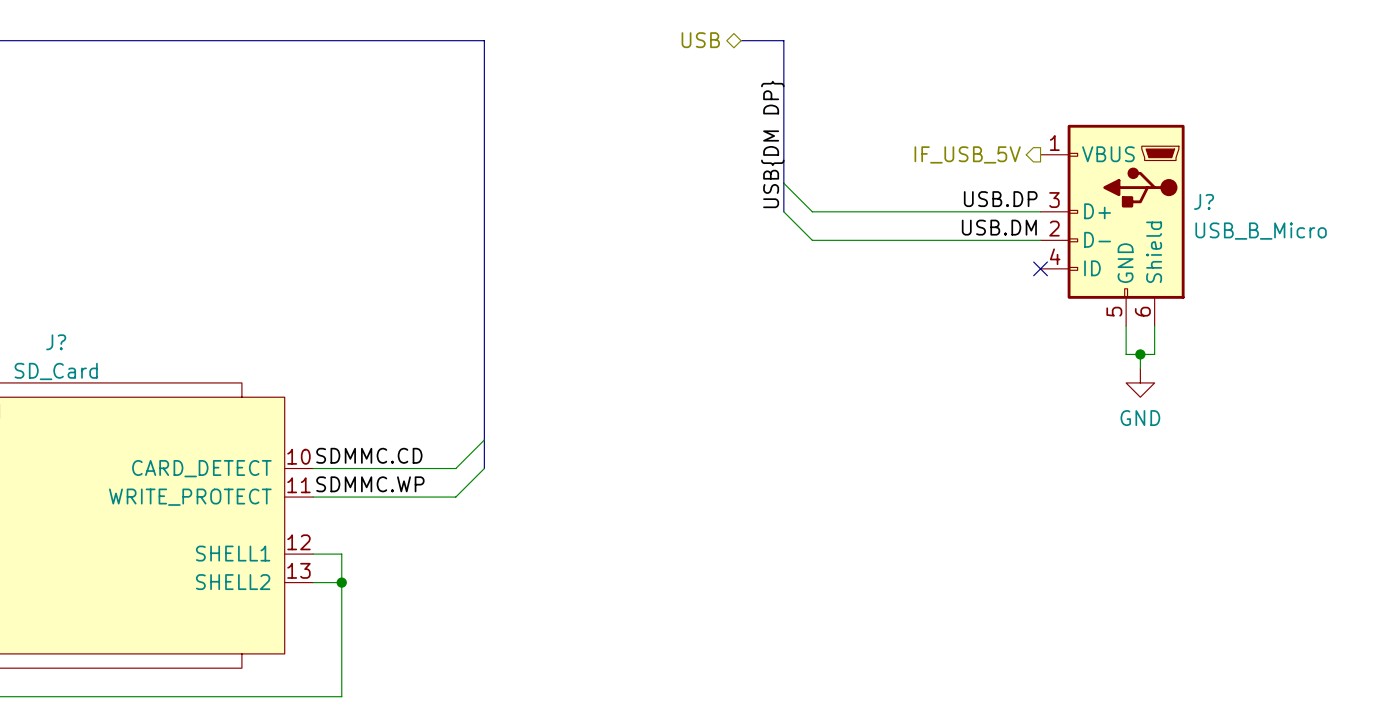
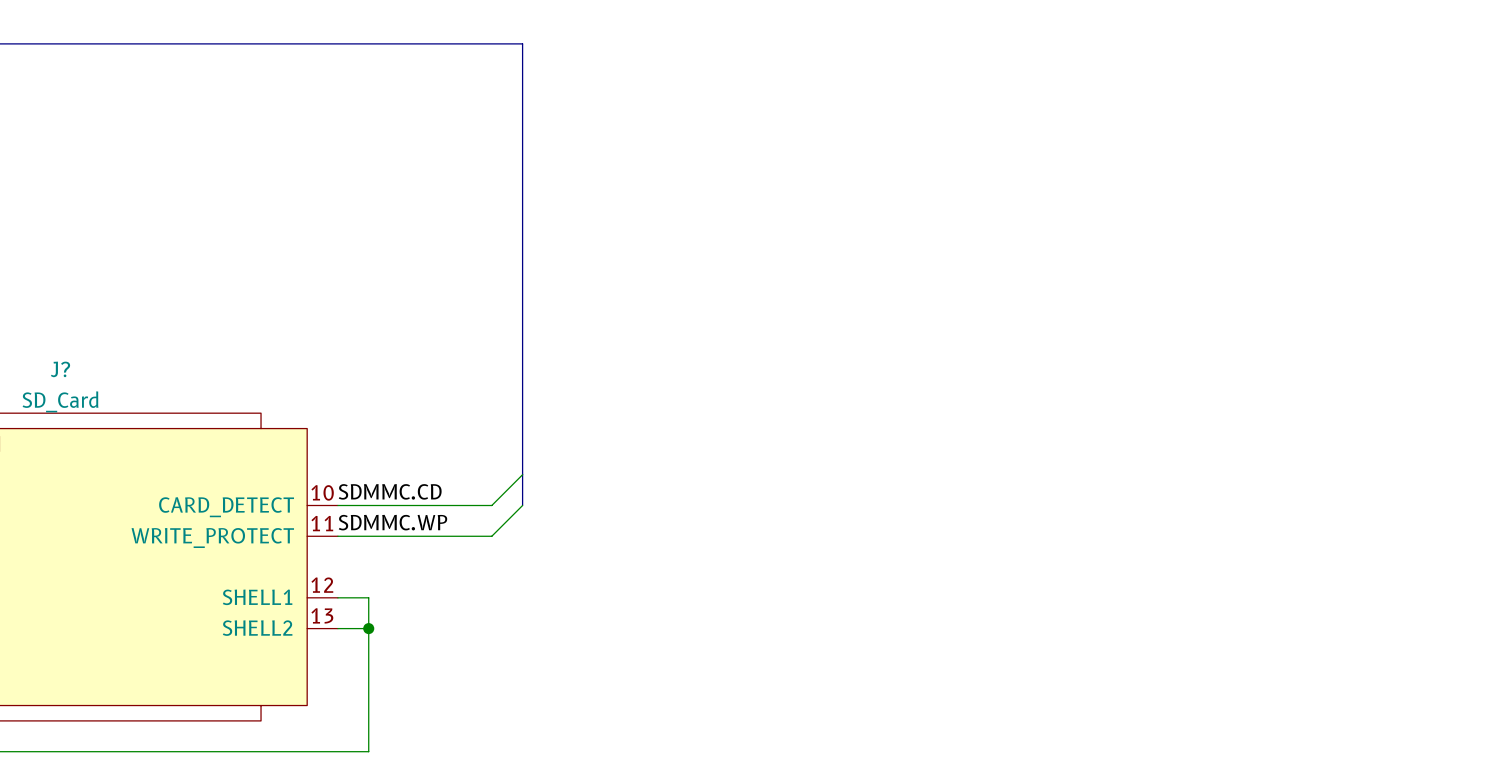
hierarchical label: USB (700, 40) -> none
bus: (741, 40) (783, 40) (783, 211) -> none
label: USB{DM DP} (772, 144) -> none
hierarchical label: IF_USB_5V (967, 154) -> none
wire: (783, 183) (812, 211) (1040, 211) -> none
label: USB.DP (1000, 199) -> none
wire: (783, 211) (812, 240) (1040, 240) -> none
J?: USB_B_Micro (1112, 225) -> none
label: USB.DM (999, 227) -> none
no-connect mark: (1040, 268) -> none
wire: (1126, 325) (1126, 354) (1154, 354) (1154, 325) -> none
wire: (1140, 354) (1140, 368) -> none
junction: (1140, 354) -> none
power symbol: GND (1140, 382) -> none

